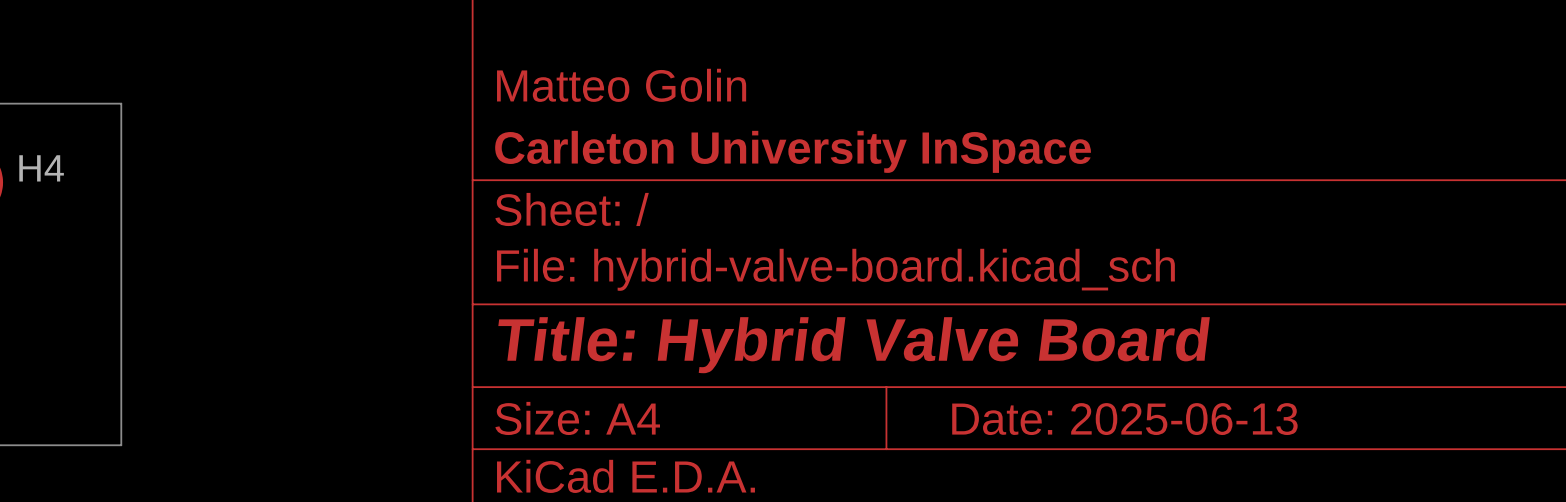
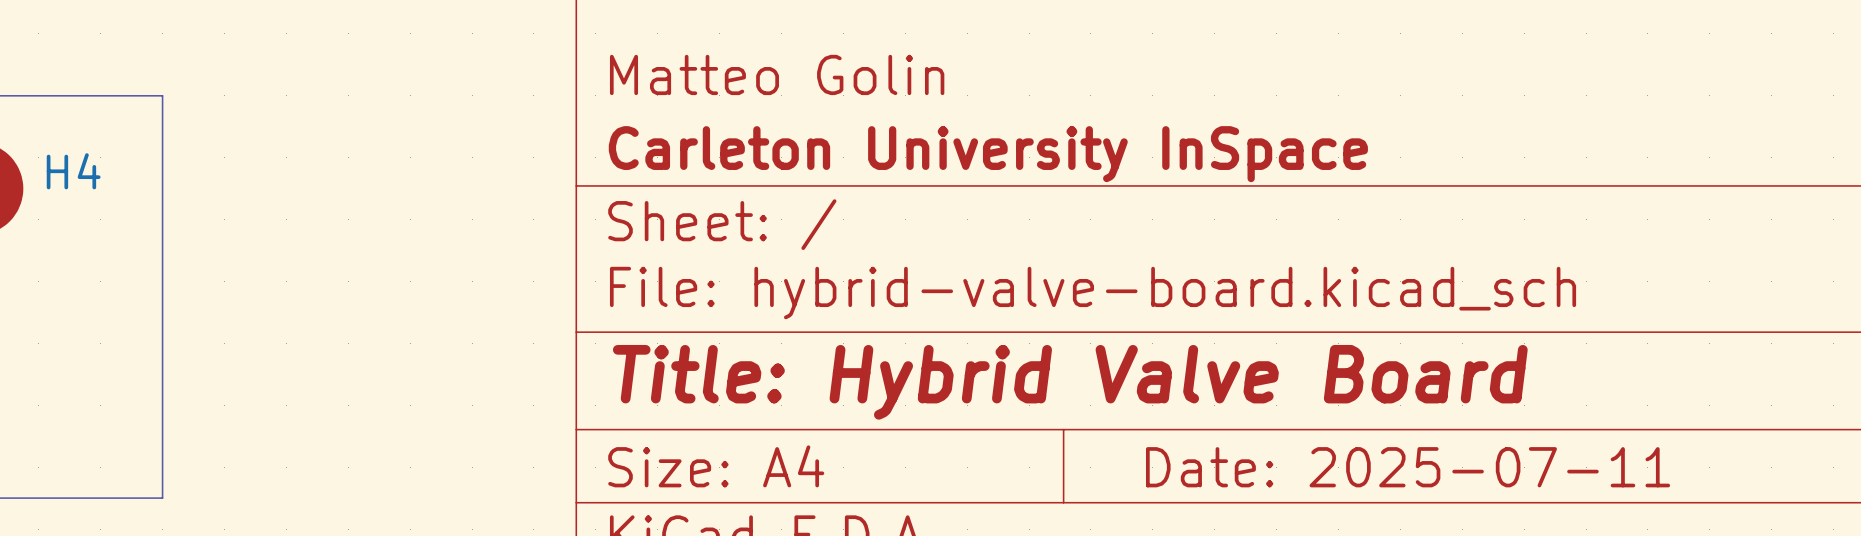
title block: Date: 2025-06-13 (1124, 419) -> Date: 2025-07-11 (1408, 467)

